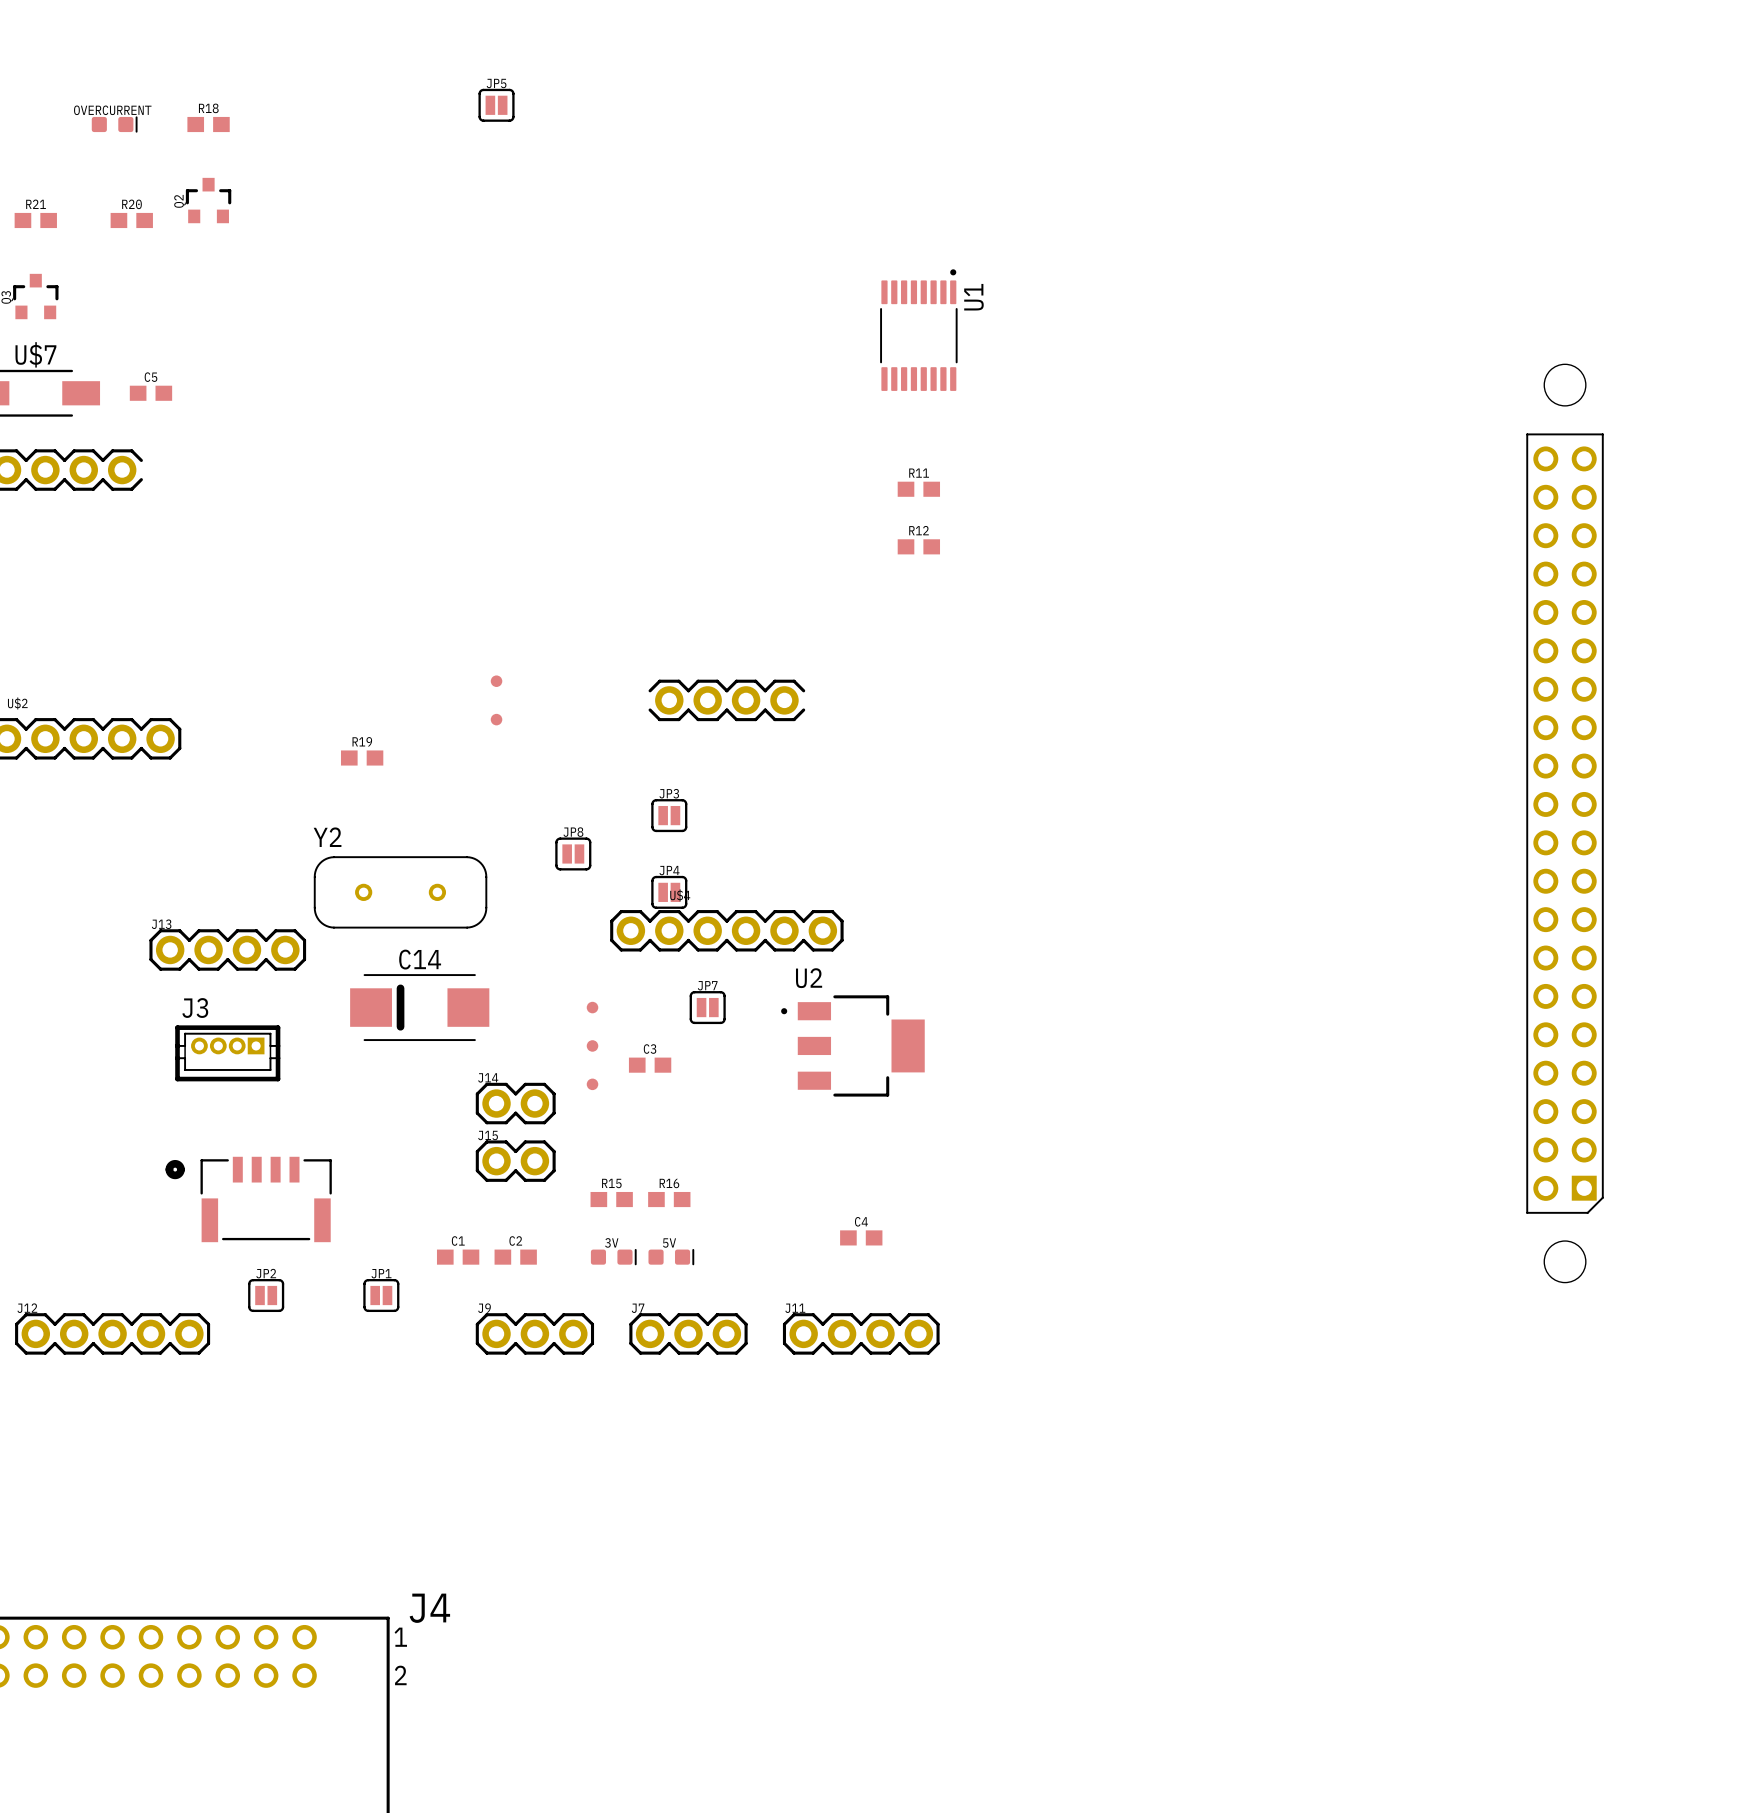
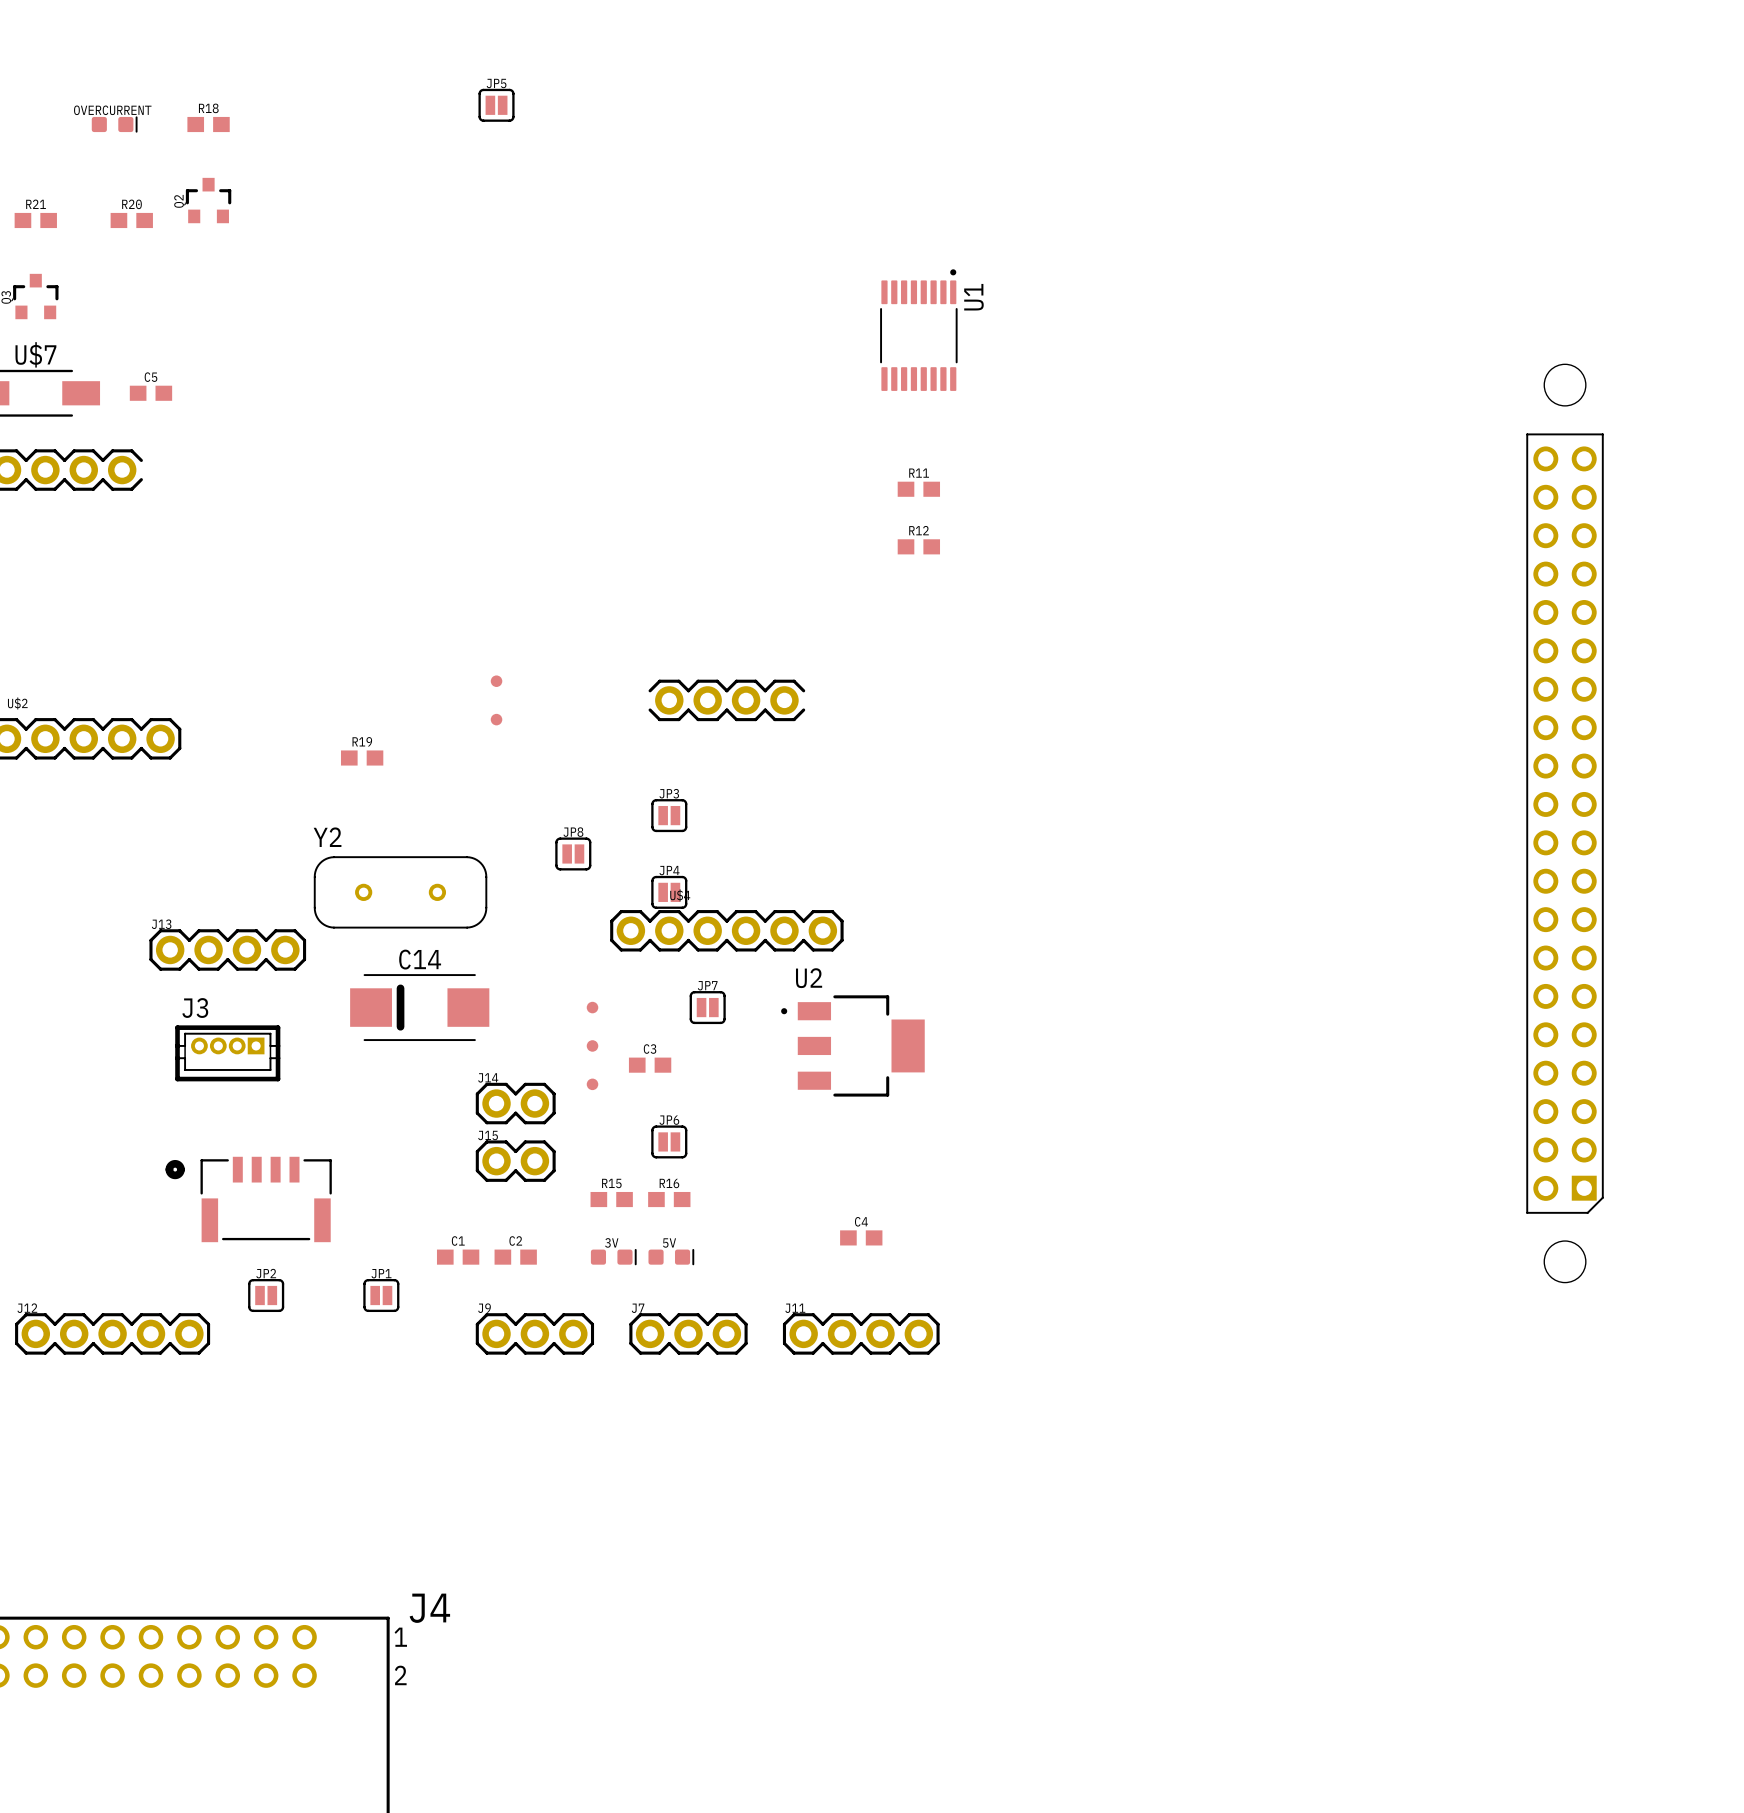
JP6: none -> (669, 1141)

